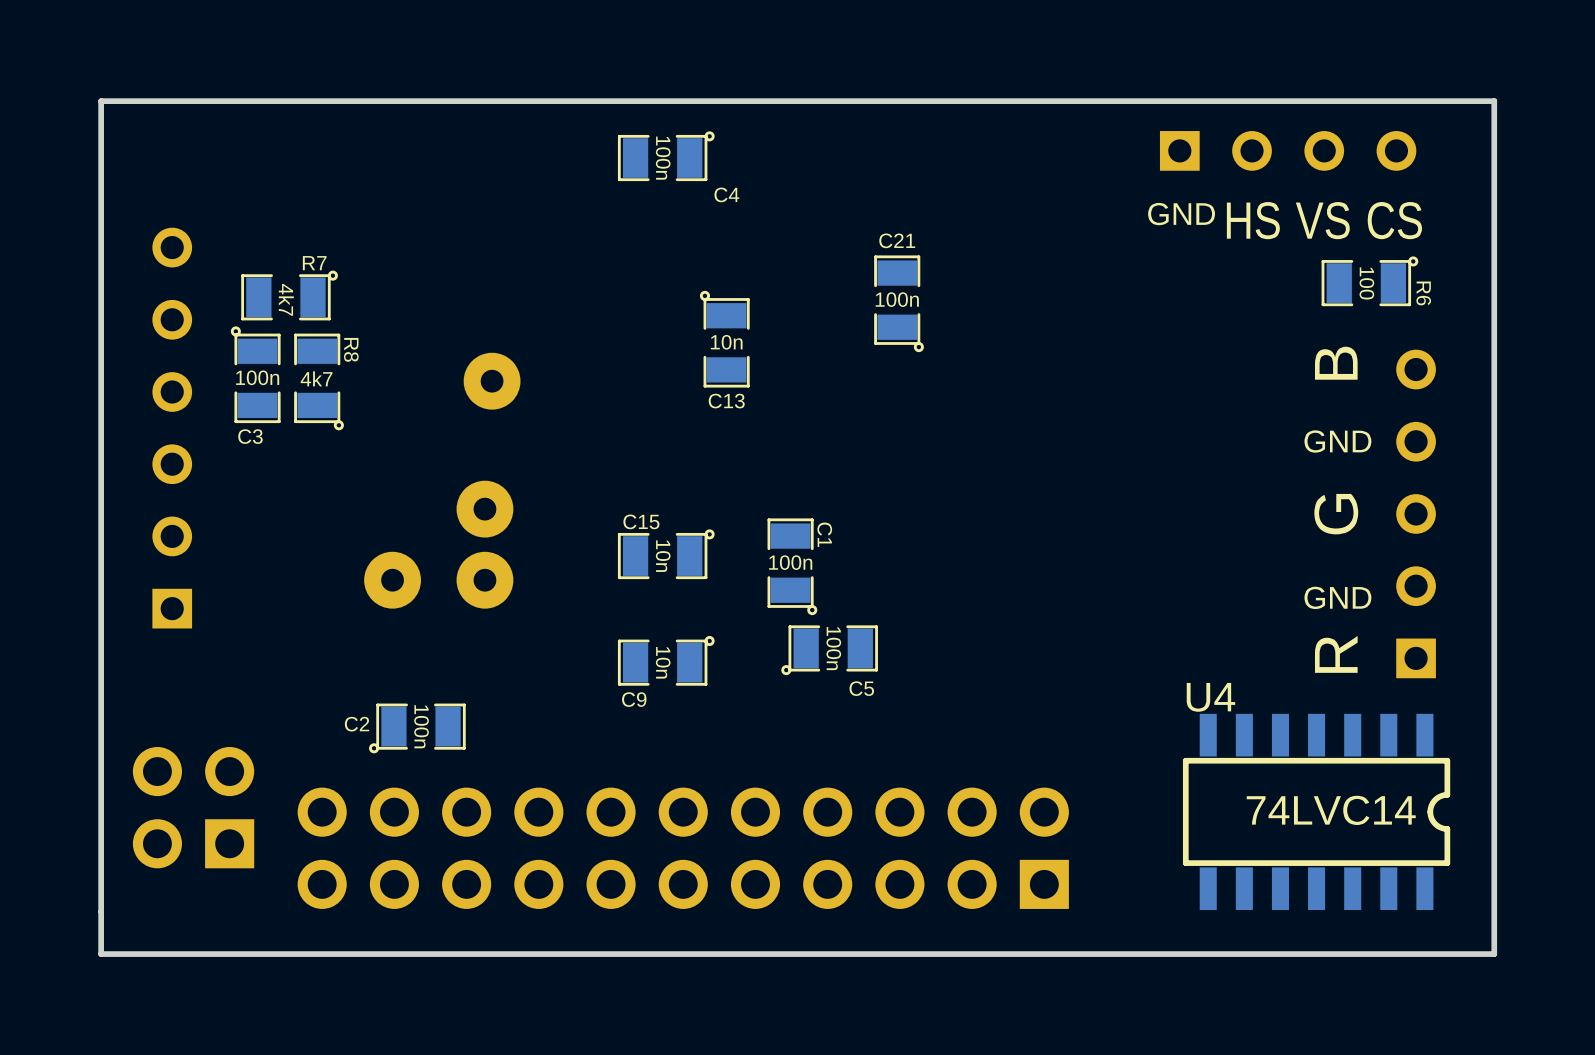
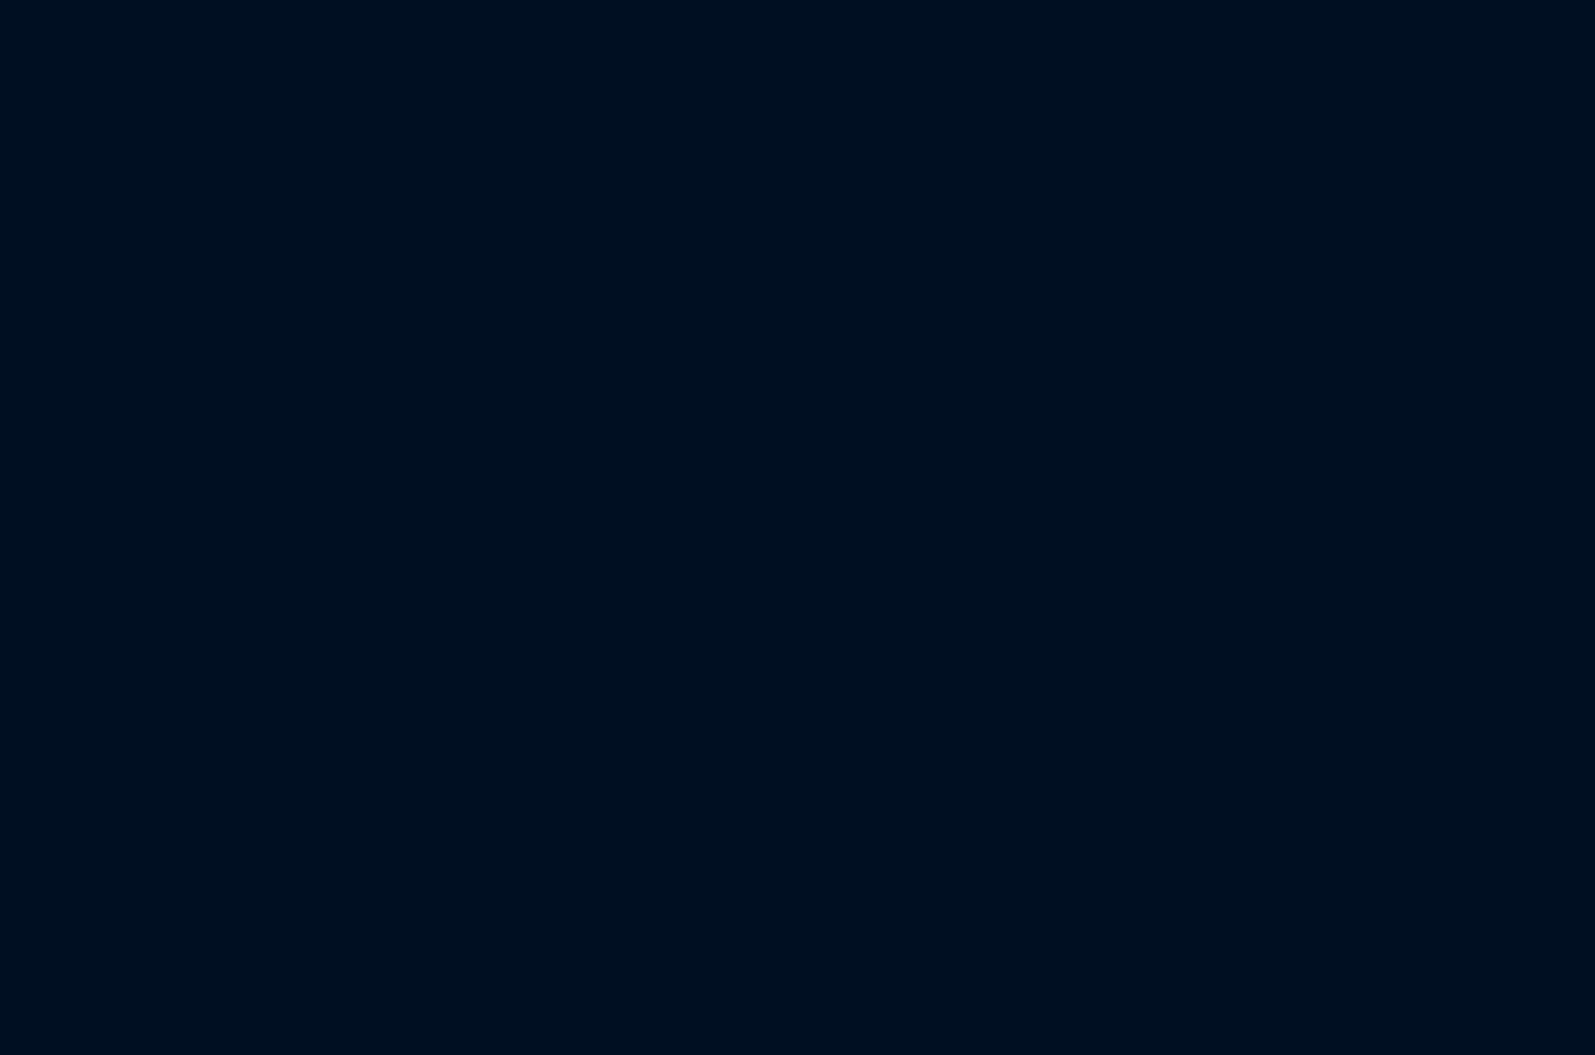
board edge: (1494, 101) (1494, 954) (101, 954) (101, 101) (1494, 101) -> none
part: (1288, 150) -> none
C4: 100n (666, 156) -> none
text: GND (1181, 214) -> none
text: HS (1253, 220) -> none
text: VS (1322, 220) -> none
text: CS (1394, 220) -> none
R6: 100 (1369, 281) -> none
R7: 4k7 (289, 295) -> none
C21: 100n (899, 303) -> none
C13: 10n (724, 339) -> none
text: B (1336, 363) -> none
C3: 100n (255, 374) -> none
R8: 4k7 (319, 381) -> none
part: (492, 381) -> none
part: (172, 428) -> none
text: GND (1337, 441) -> none
part: (484, 509) -> none
part: (1416, 513) -> none
text: G (1336, 514) -> none
C15: 10n (666, 554) -> none
C1: 100n (792, 566) -> none
part: (392, 580) -> none
part: (484, 580) -> none
text: GND (1337, 597) -> none
C5: 100n (829, 650) -> none
text: R (1336, 654) -> none
C9: 10n (666, 660) -> none
C2: 100n (417, 728) -> none
part: (193, 807) -> none
U4: 74LVC14 (1316, 811) -> none
part: (683, 848) -> none

